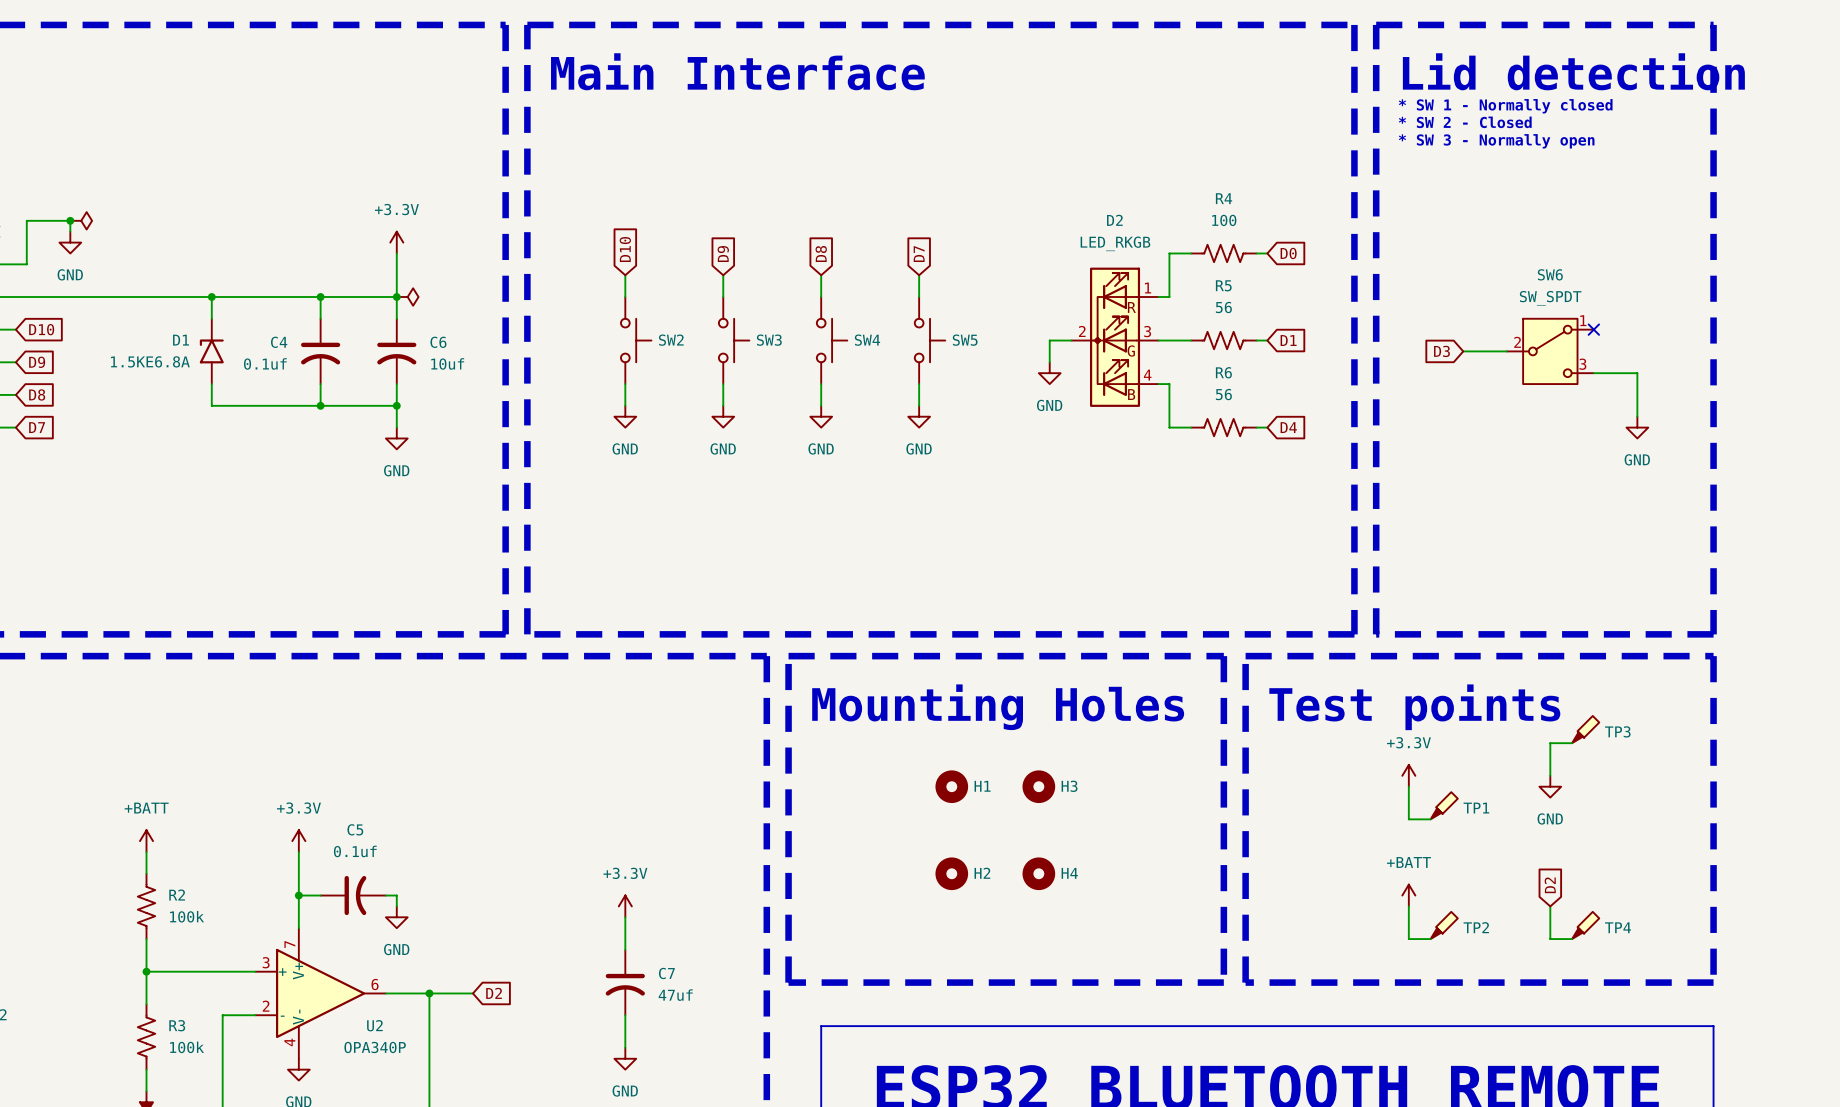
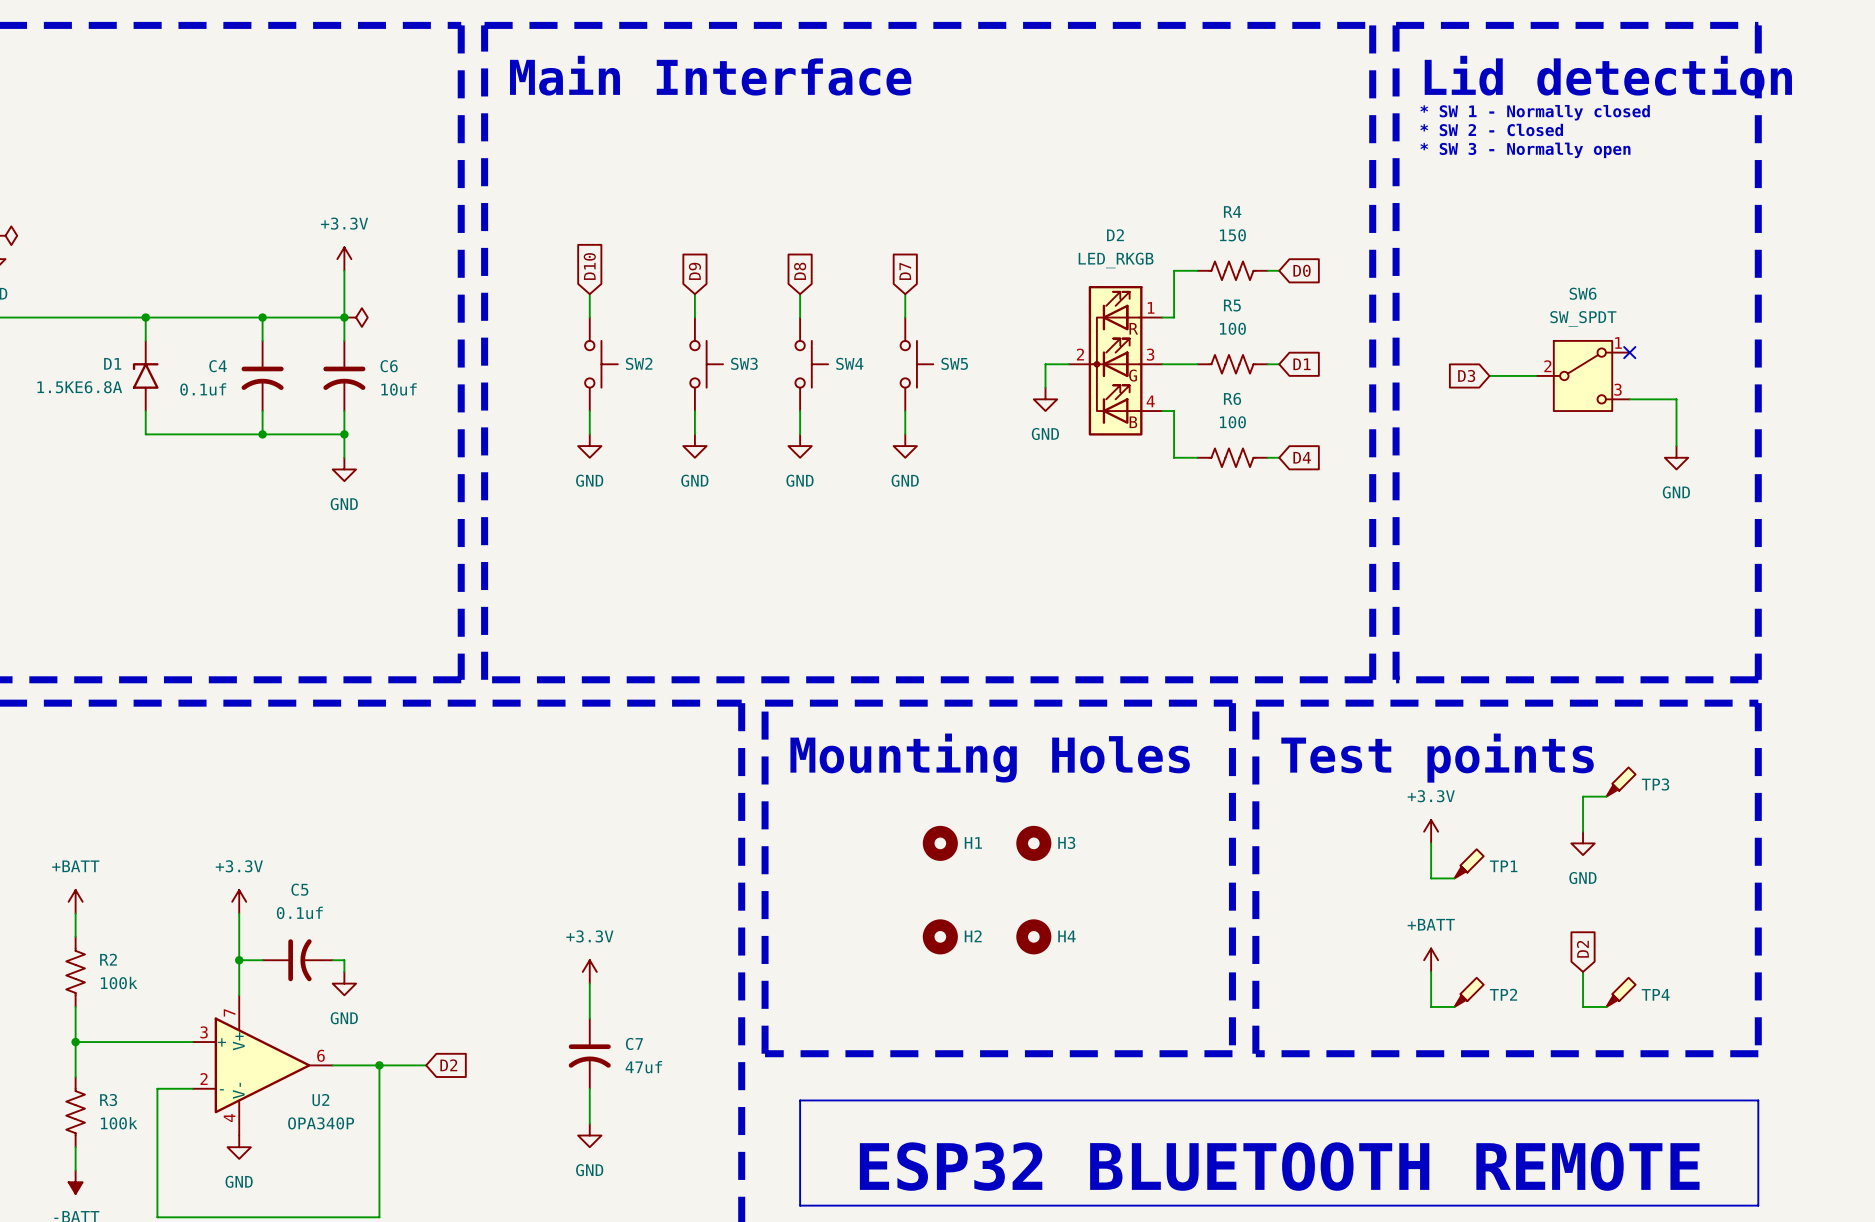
R4 value: 100 (1224, 220) -> 150 (1232, 235)
R5 value: 56 (1223, 307) -> 100 (1232, 328)
R6 value: 56 (1223, 394) -> 100 (1232, 422)

